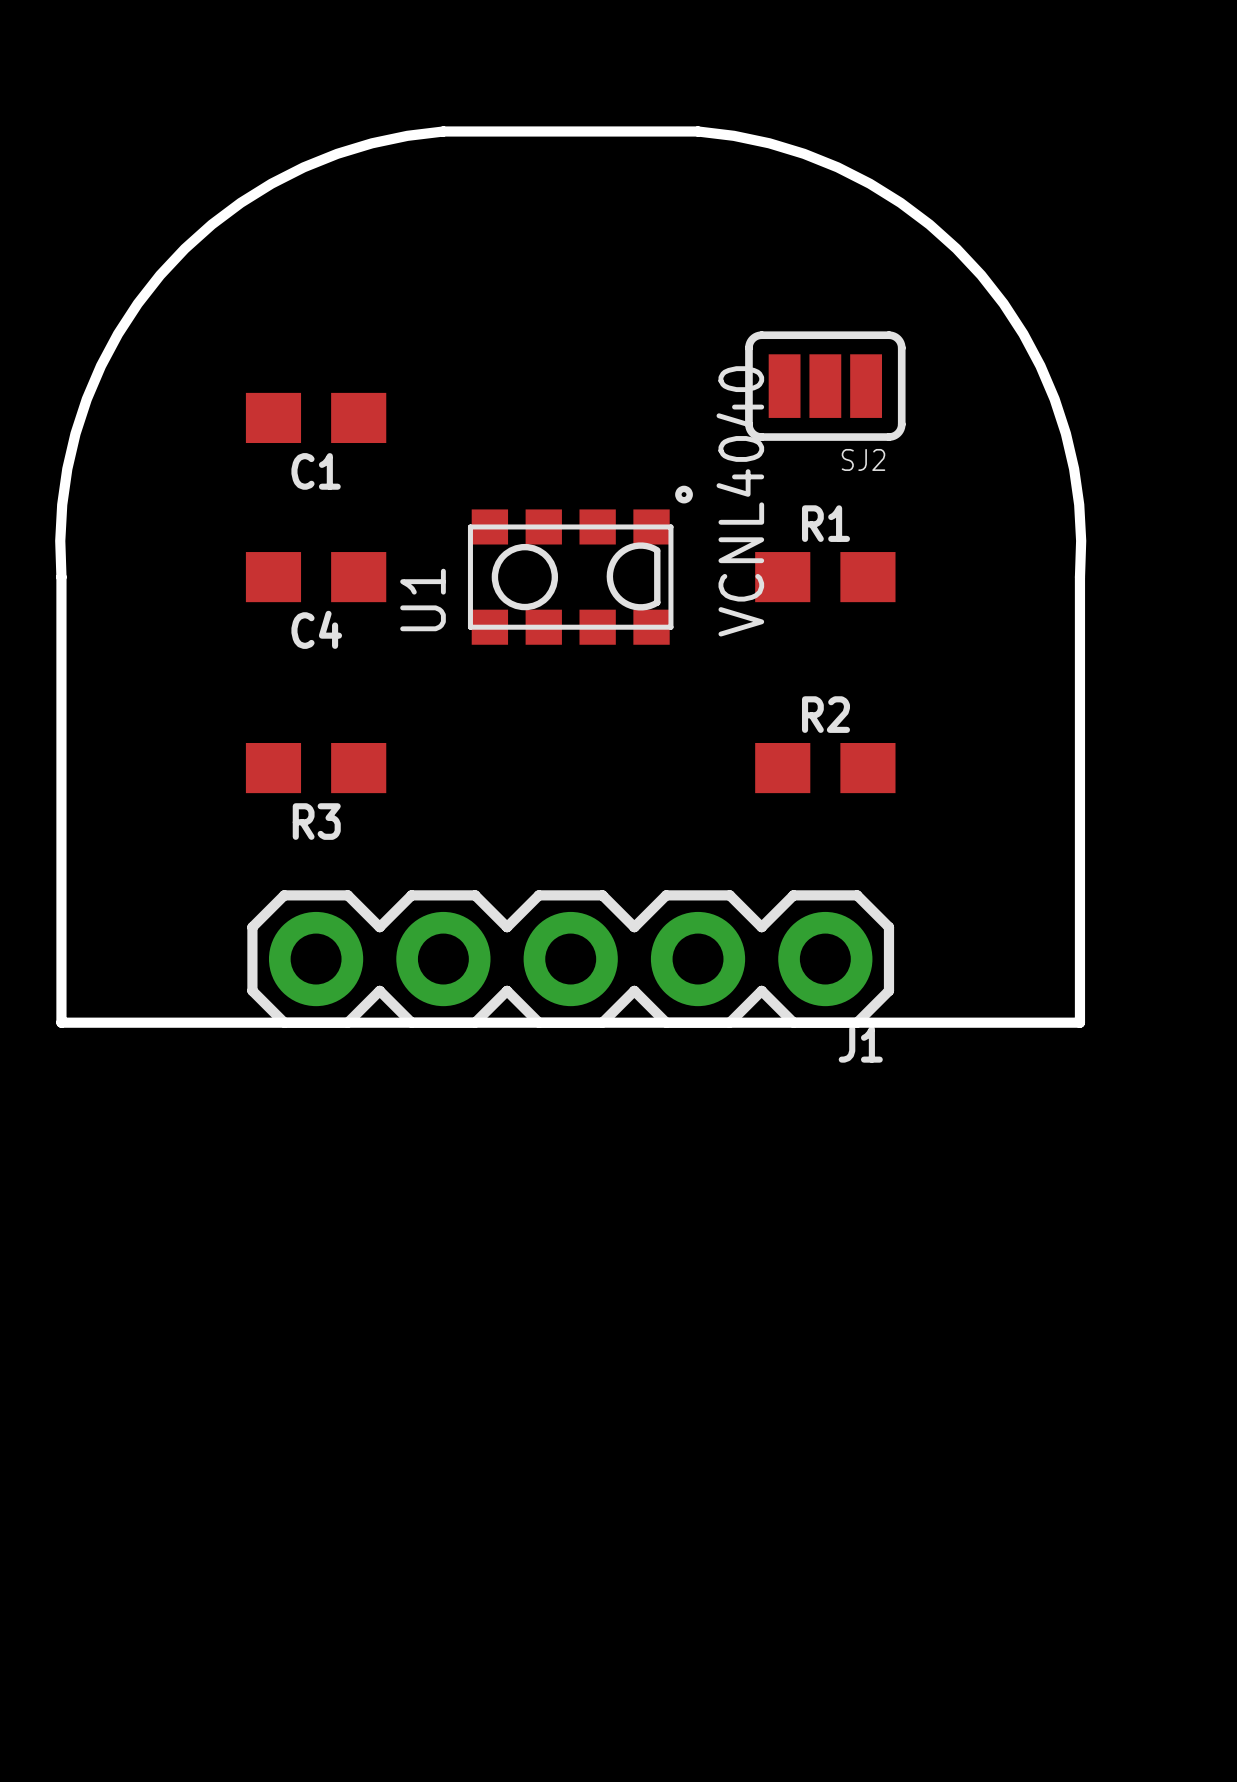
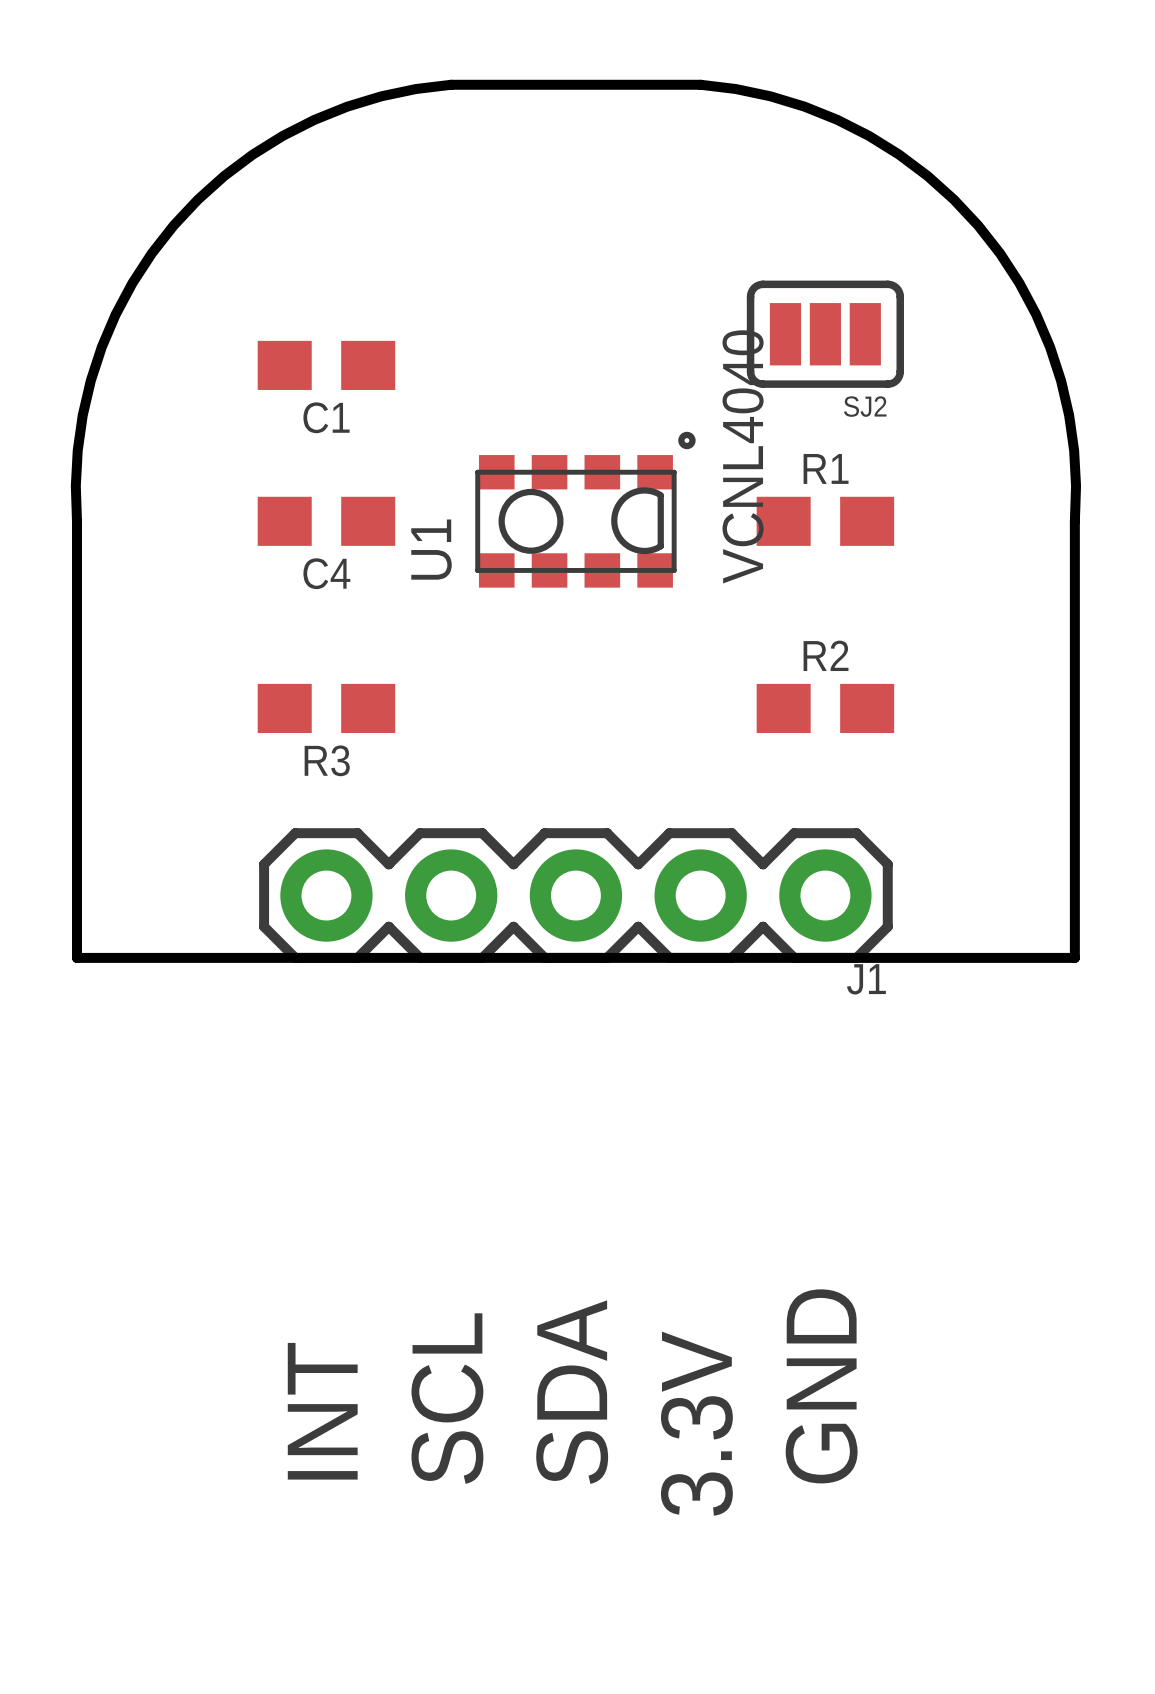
text: none -> GND (821, 1386)
text: none -> SDA (572, 1392)
text: none -> SCL (447, 1398)
text: none -> INT (322, 1411)
text: none -> 3.3V (696, 1423)

